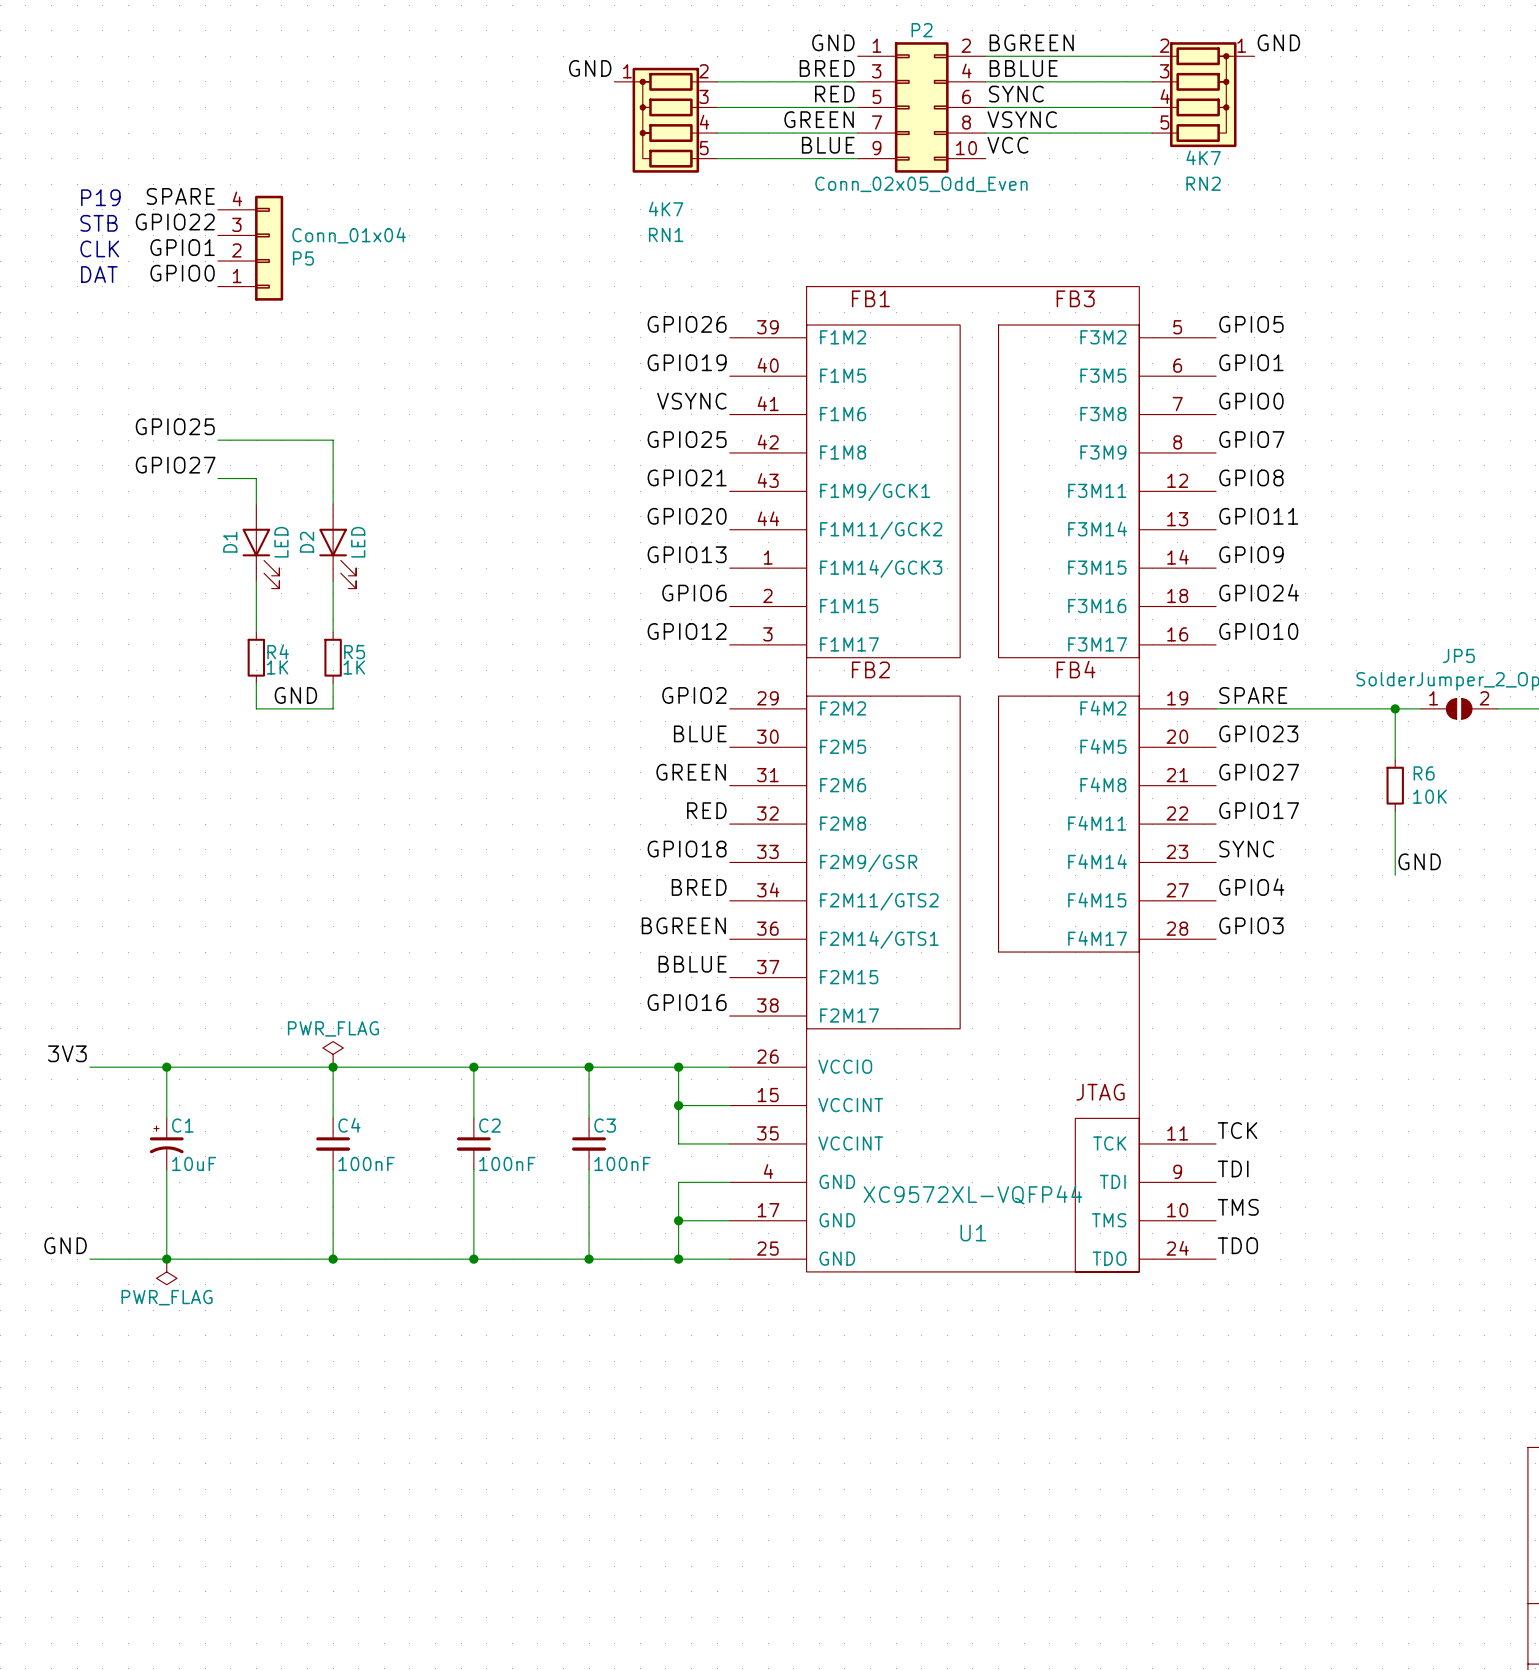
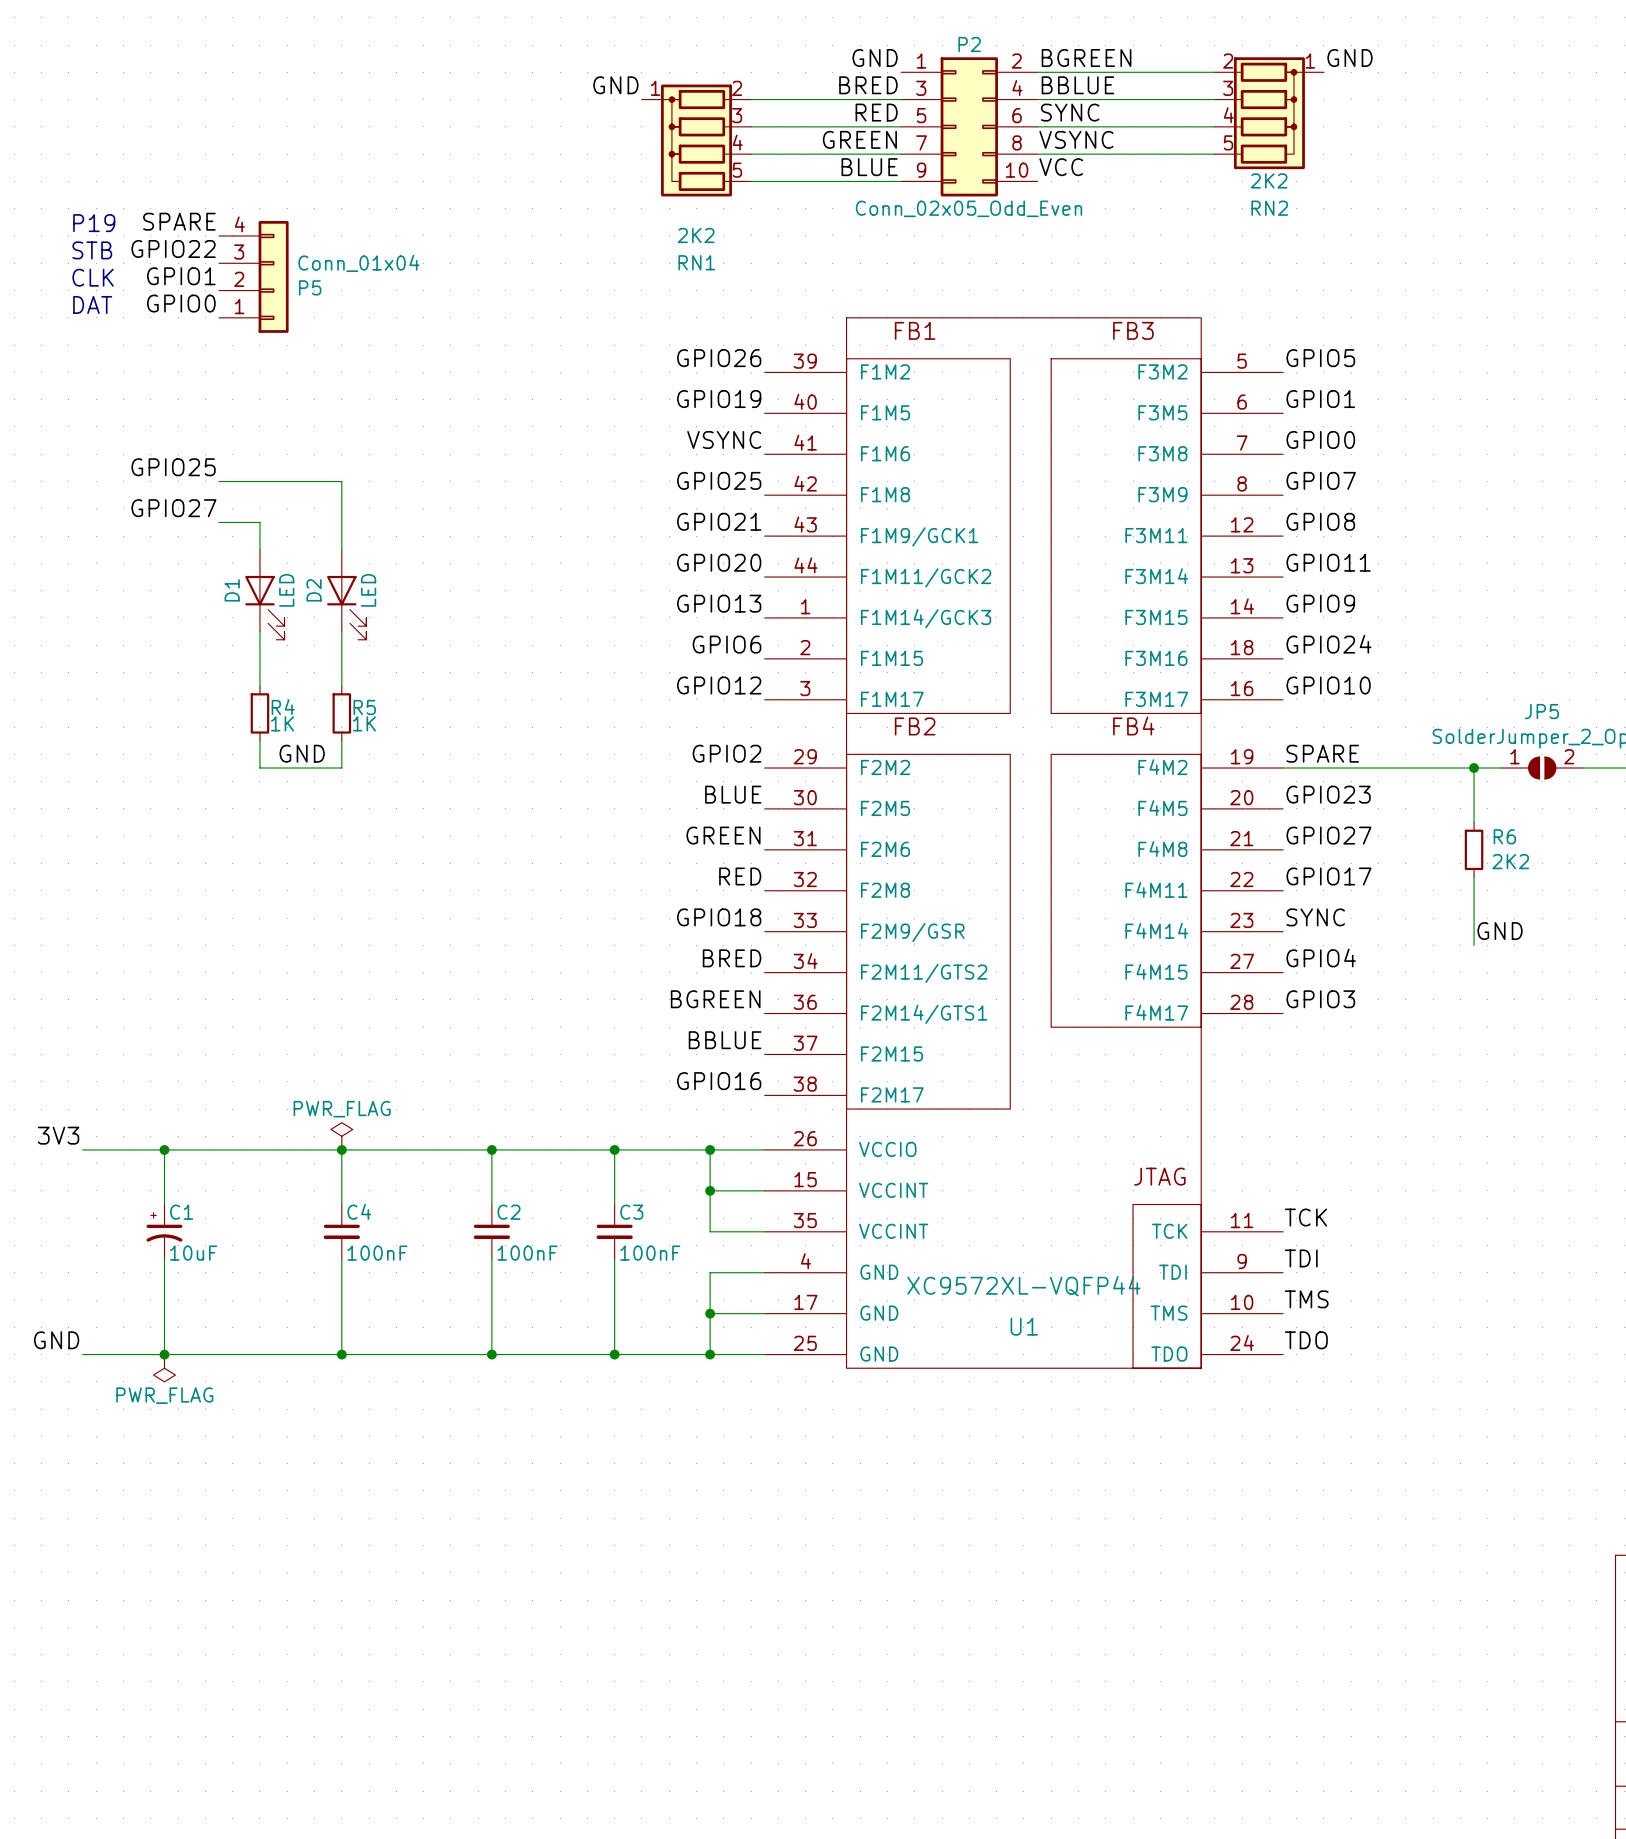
RN2 value: 4K7 (1203, 157) -> 2K2 (1269, 180)
RN1 value: 4K7 (666, 209) -> 2K2 (696, 235)
R6 value: 10K (1429, 796) -> 2K2 (1510, 861)

